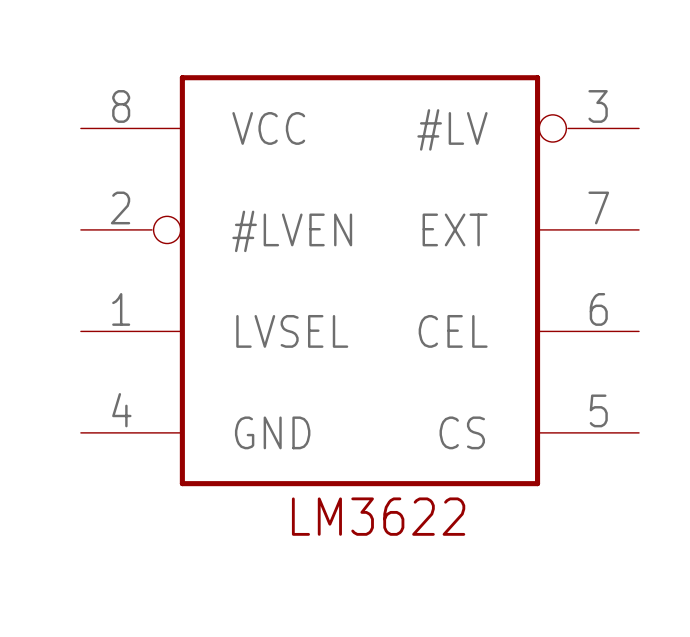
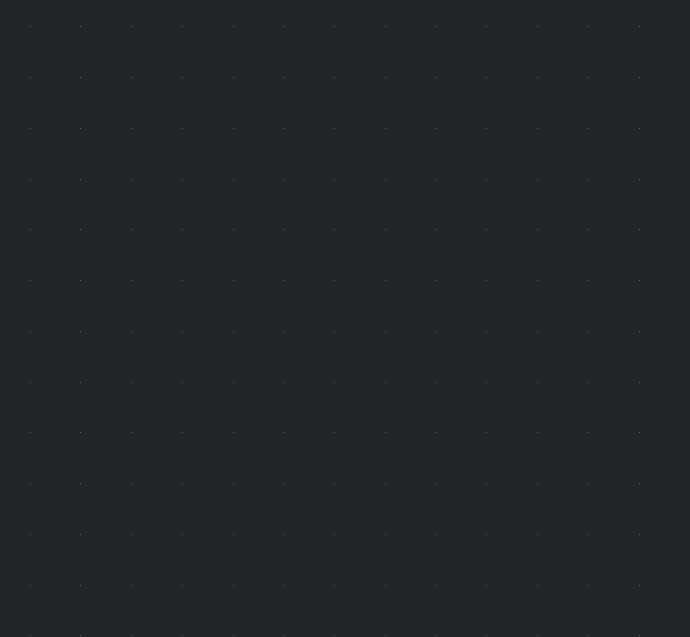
part: (359, 280) -> none

